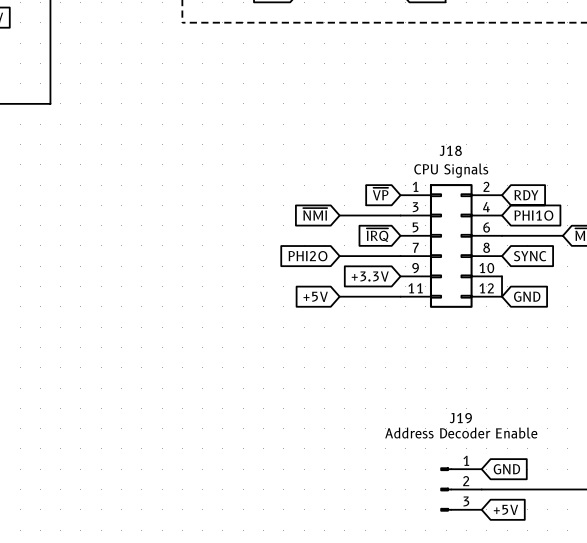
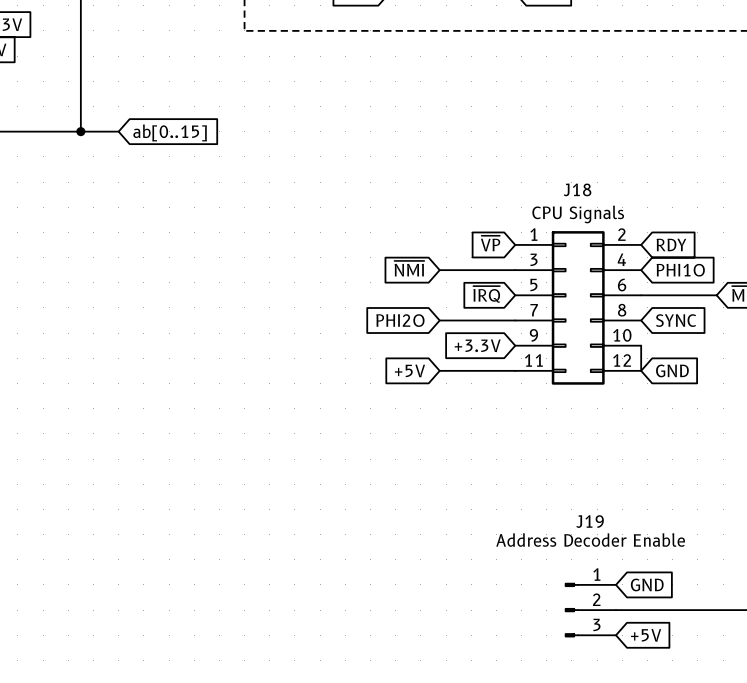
bus: none -> (80, 131) (118, 131)
junction: none -> (80, 131)
global label: none -> ab[0..15] (170, 132)

